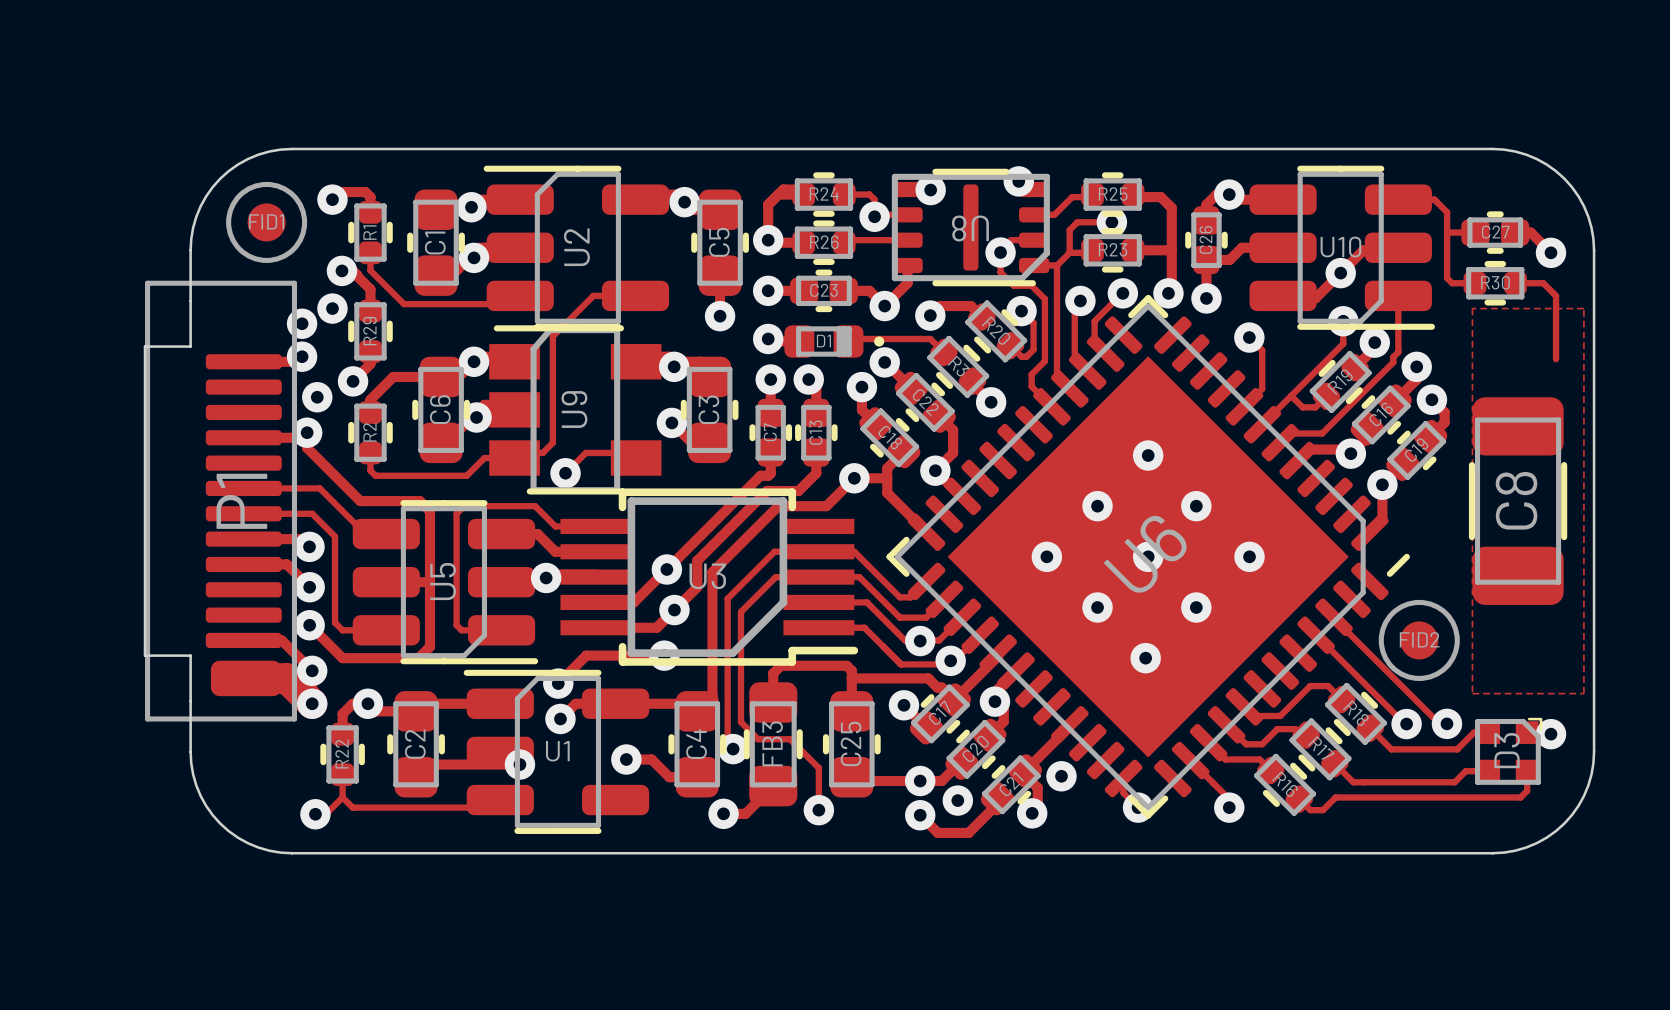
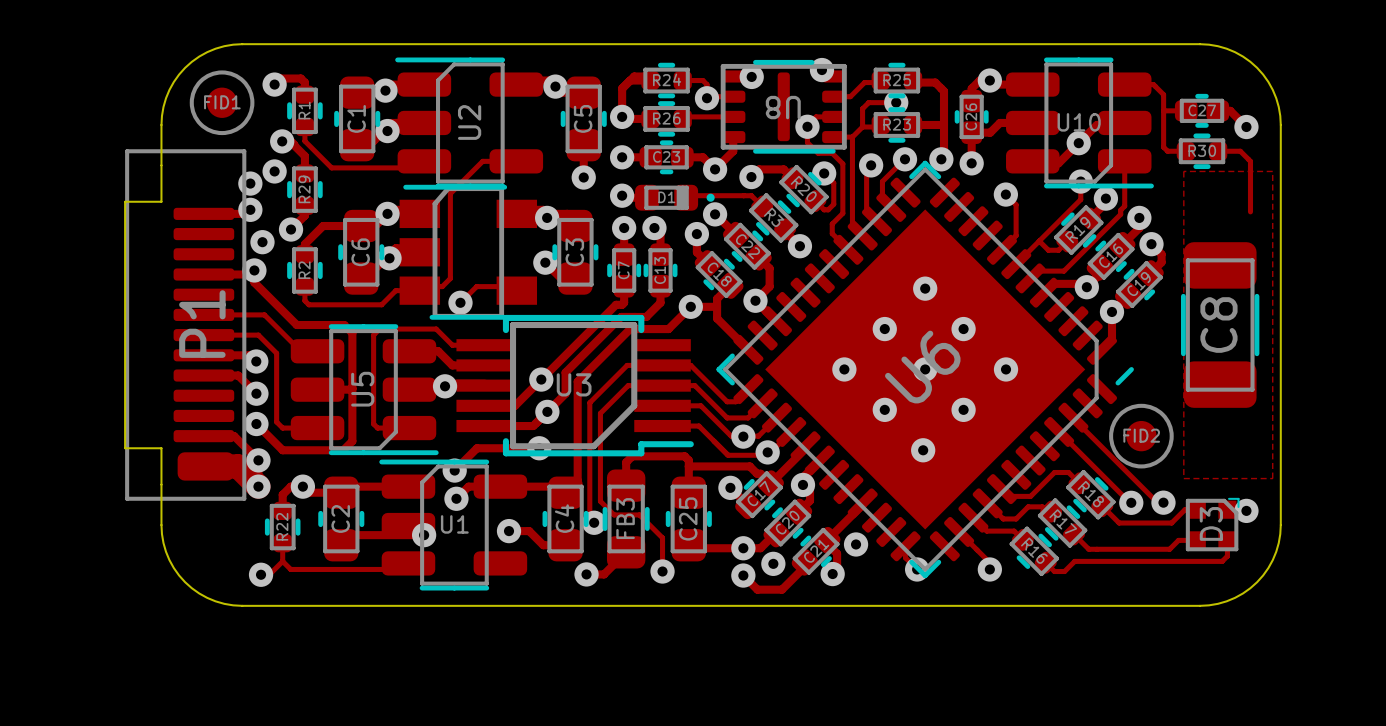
U8 footprint: [891, 168, 1050, 287] -> [720, 59, 847, 154]
U9 name: U9 (574, 409) -> none

